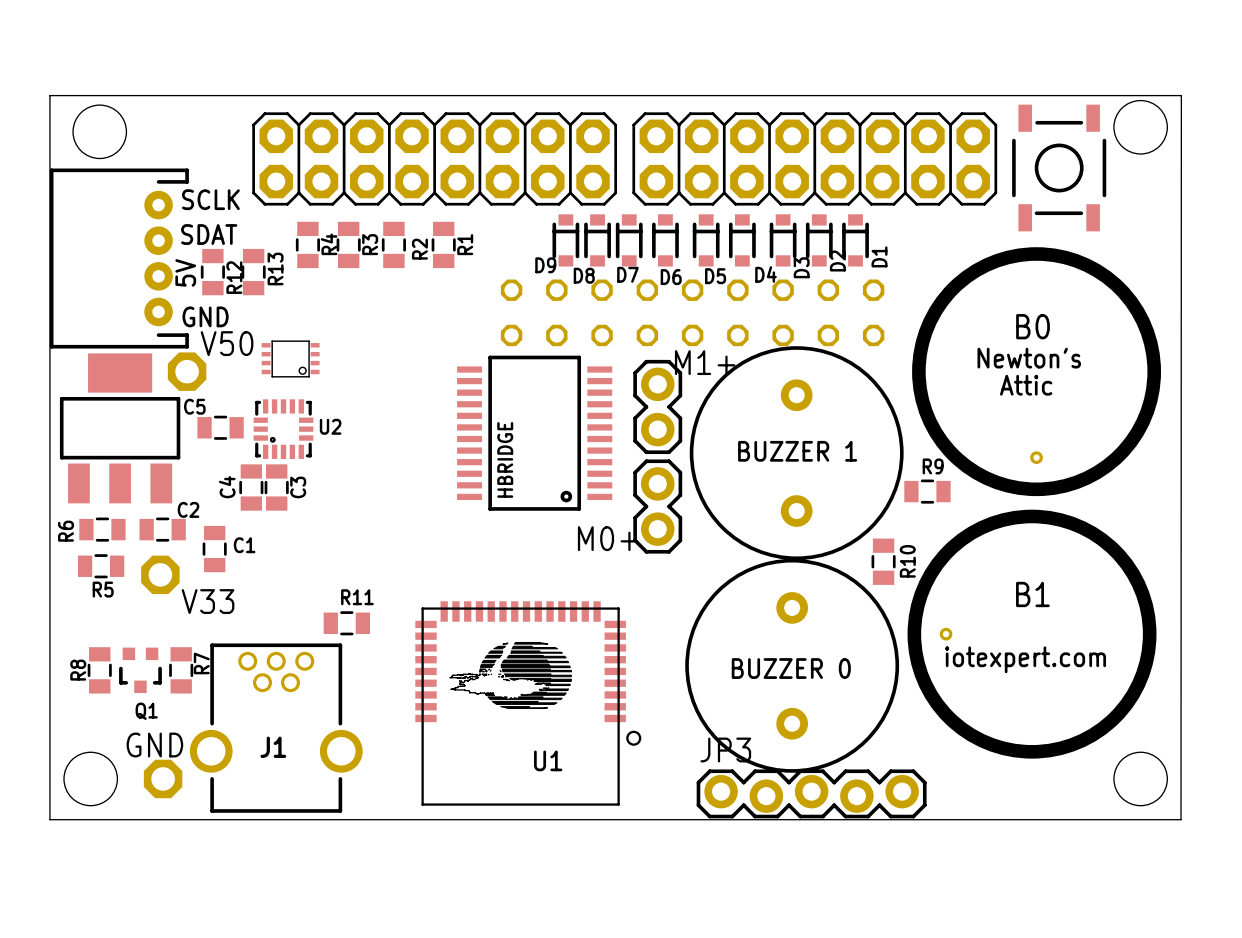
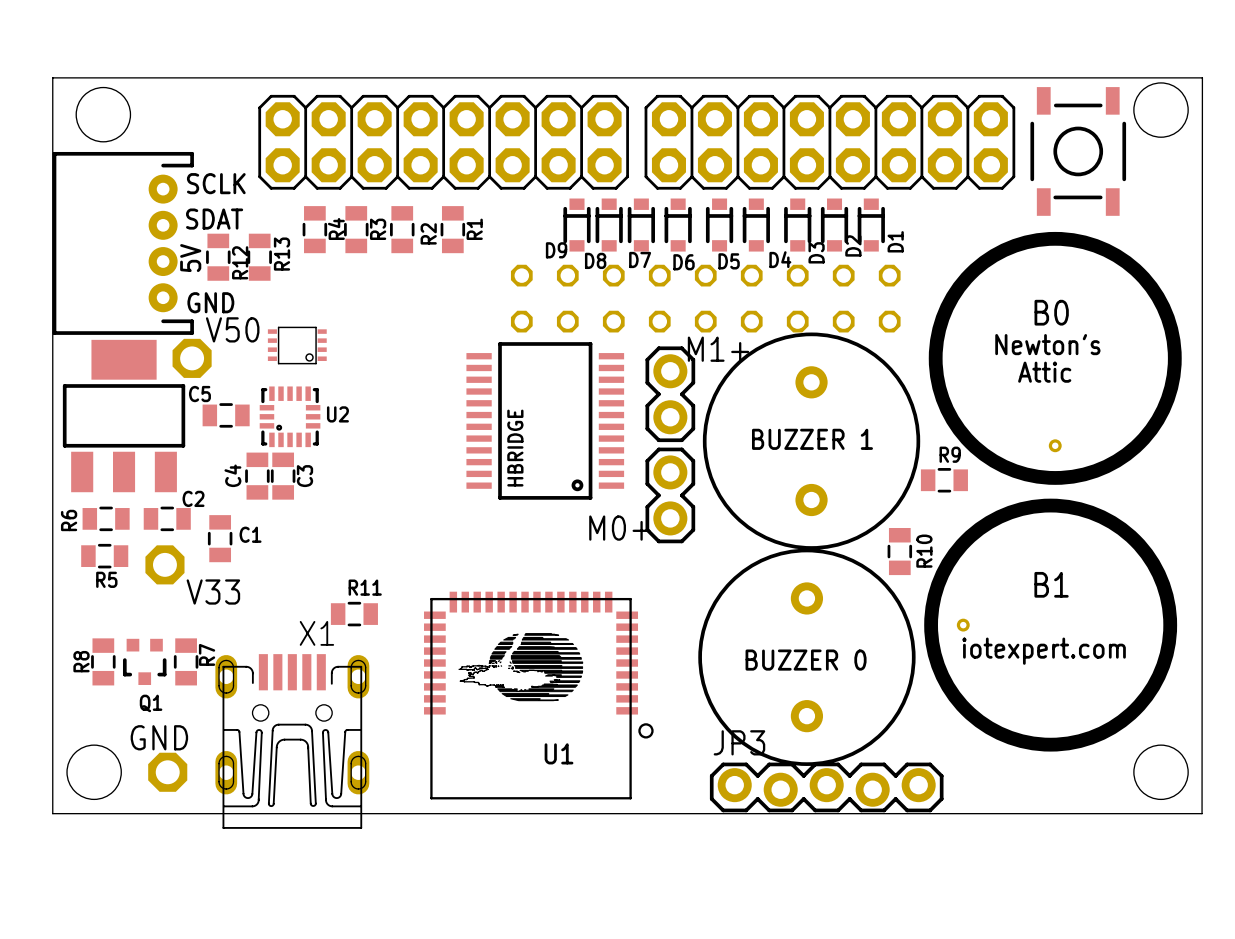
J1: (276, 728) -> none
X1: none -> (292, 741)

